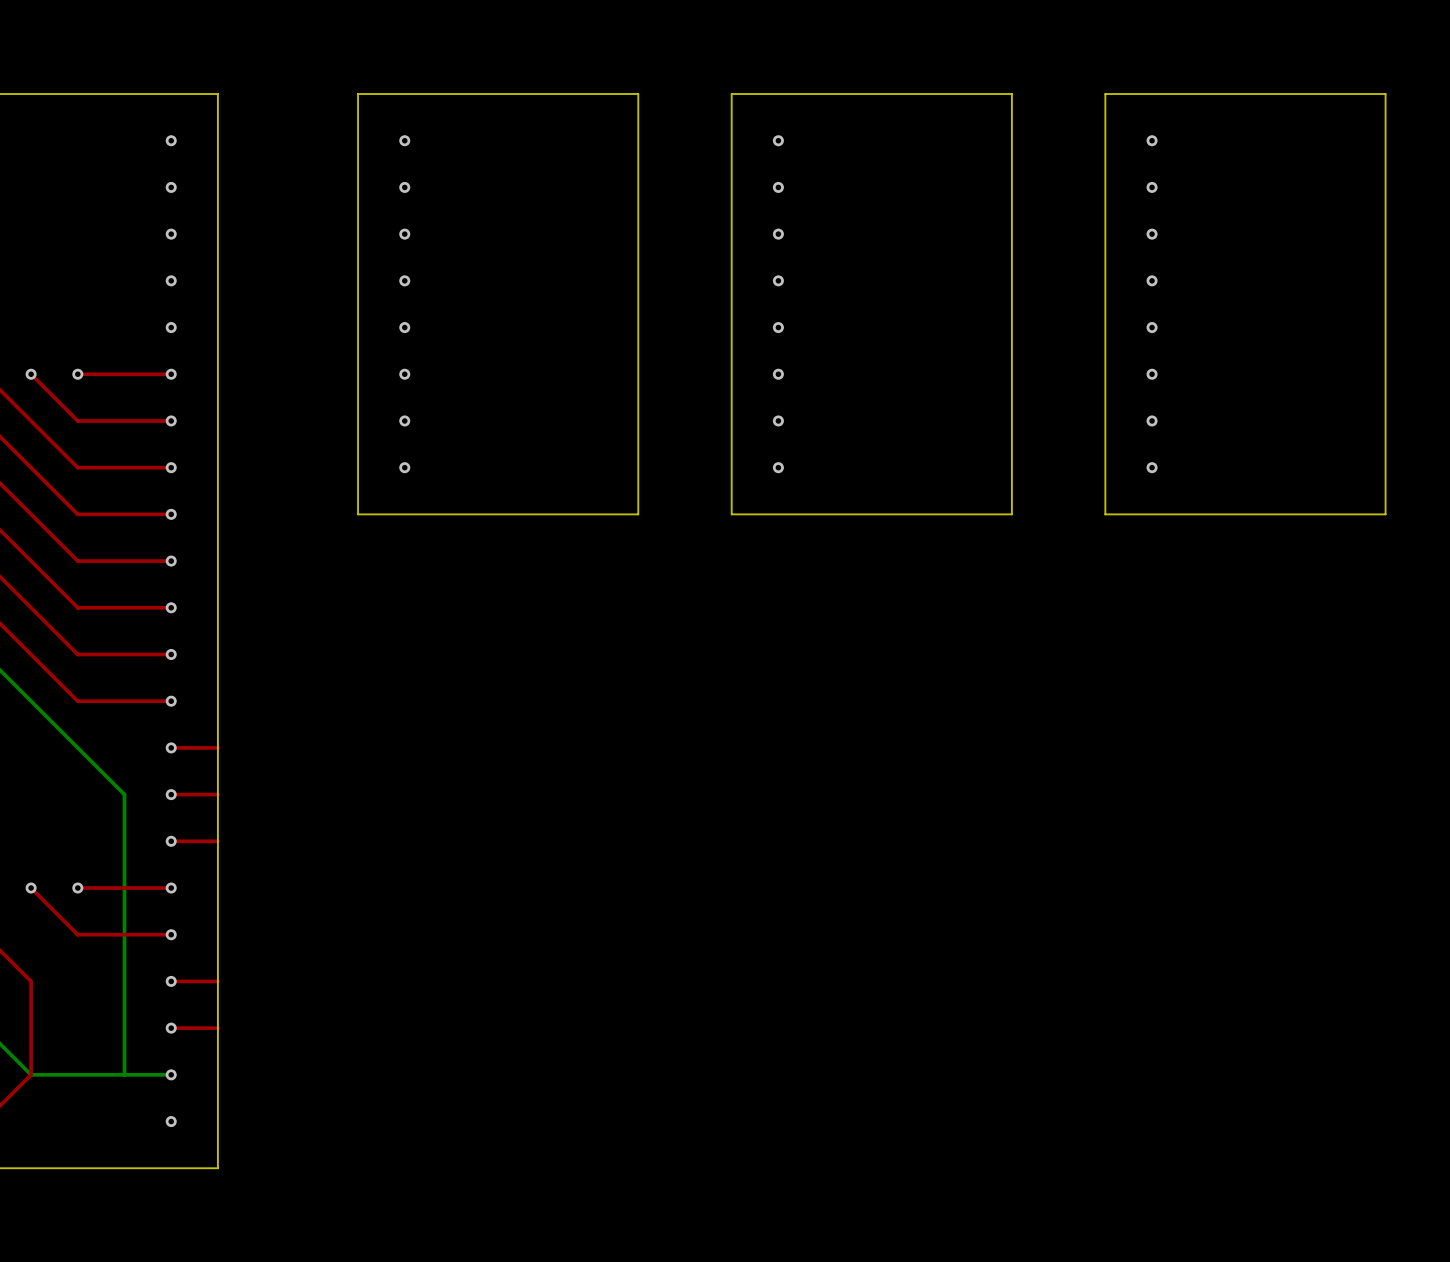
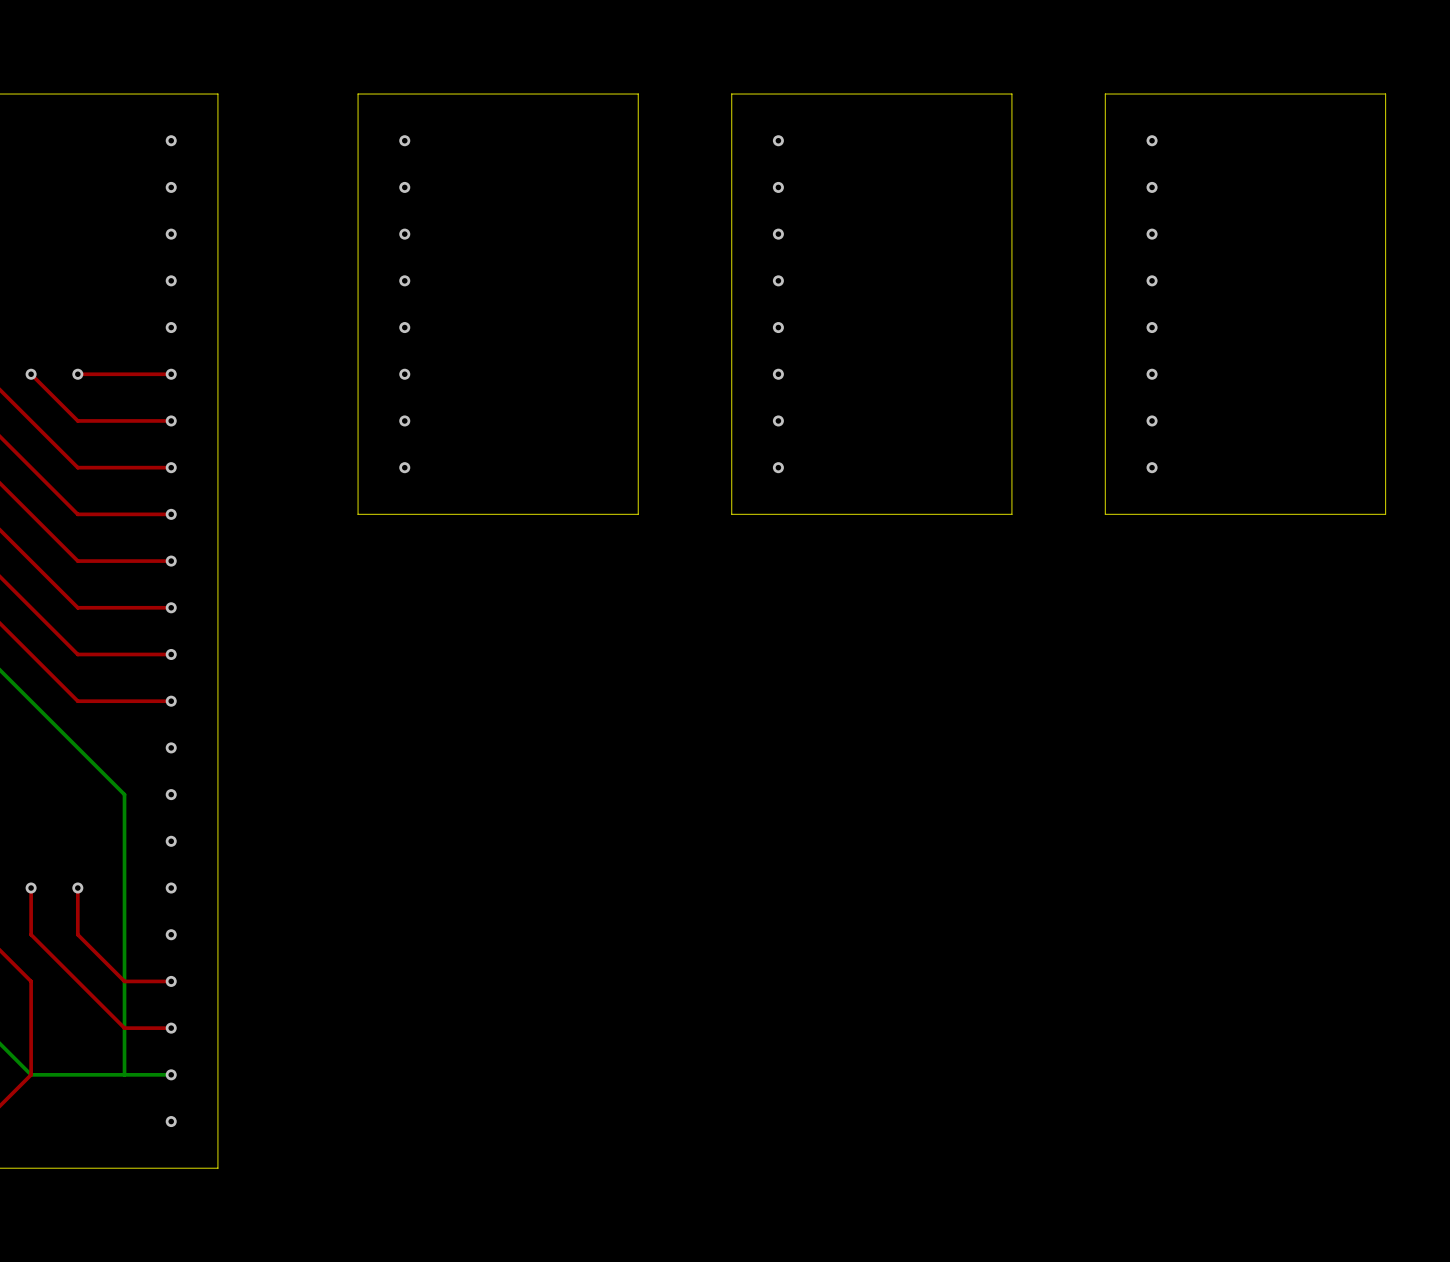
top track: (171, 747) (217, 747) -> none
top track: (171, 794) (217, 794) -> none
top track: (171, 841) (217, 841) -> none
top track: (31, 888) (77, 934) (171, 934) -> (31, 888) (31, 934) (124, 1028) (171, 1028)
top track: (77, 888) (171, 888) -> (77, 888) (77, 934) (124, 981) (171, 981)
top track: (171, 981) (217, 981) -> none
top track: (171, 1028) (217, 1028) -> none

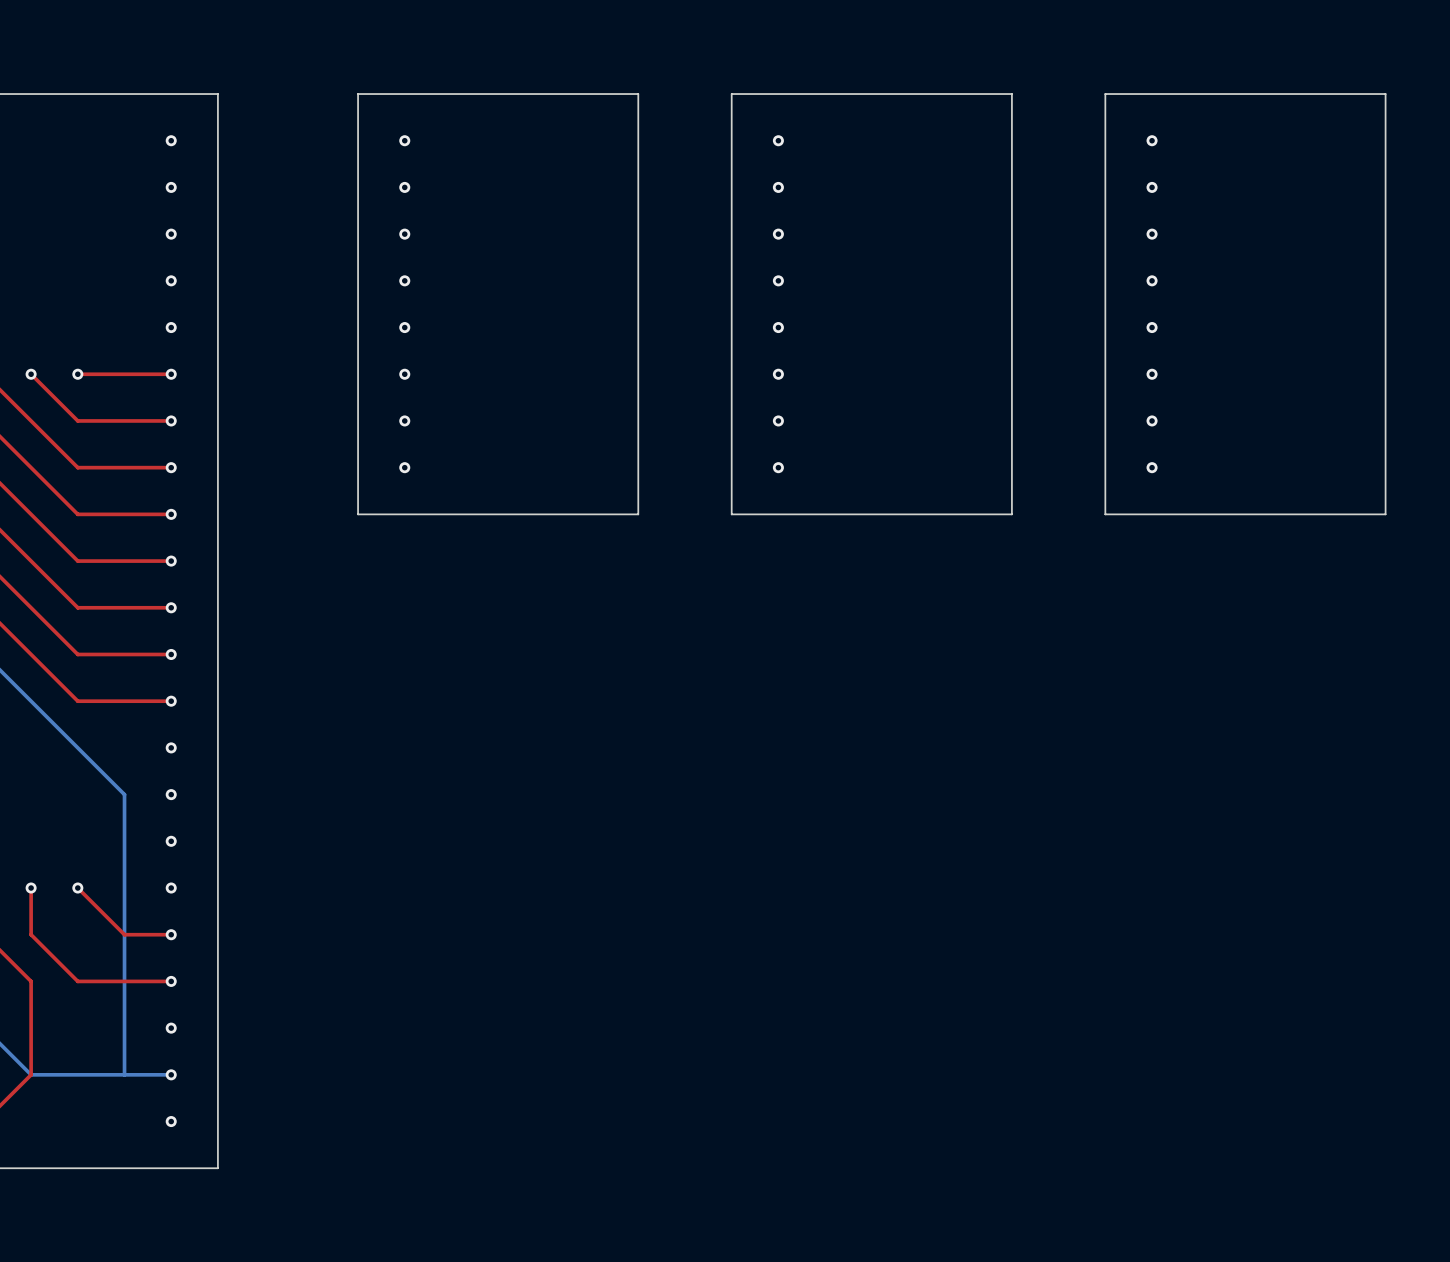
top track: (77, 888) (77, 934) (124, 981) -> (77, 888) (124, 934) (171, 934)
top track: (77, 981) (124, 1028) (171, 1028) -> (77, 981) (124, 981)

